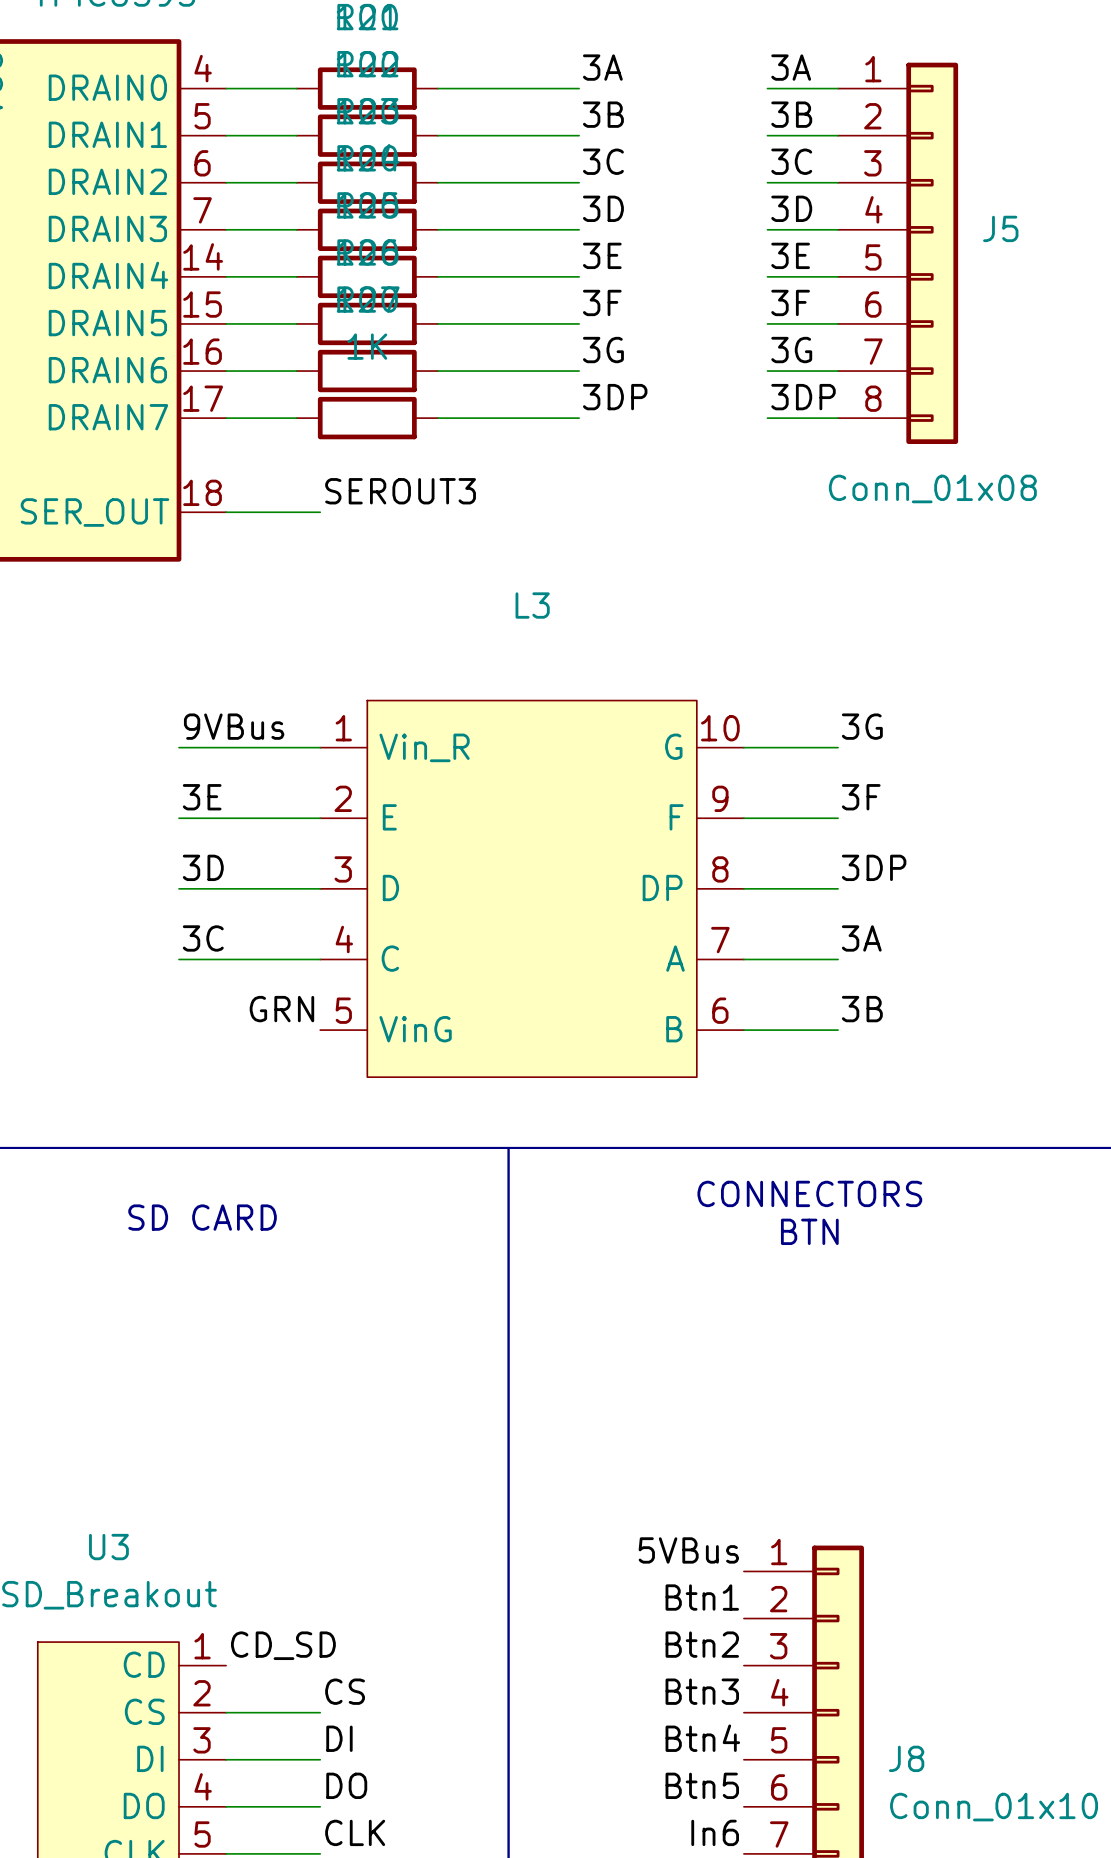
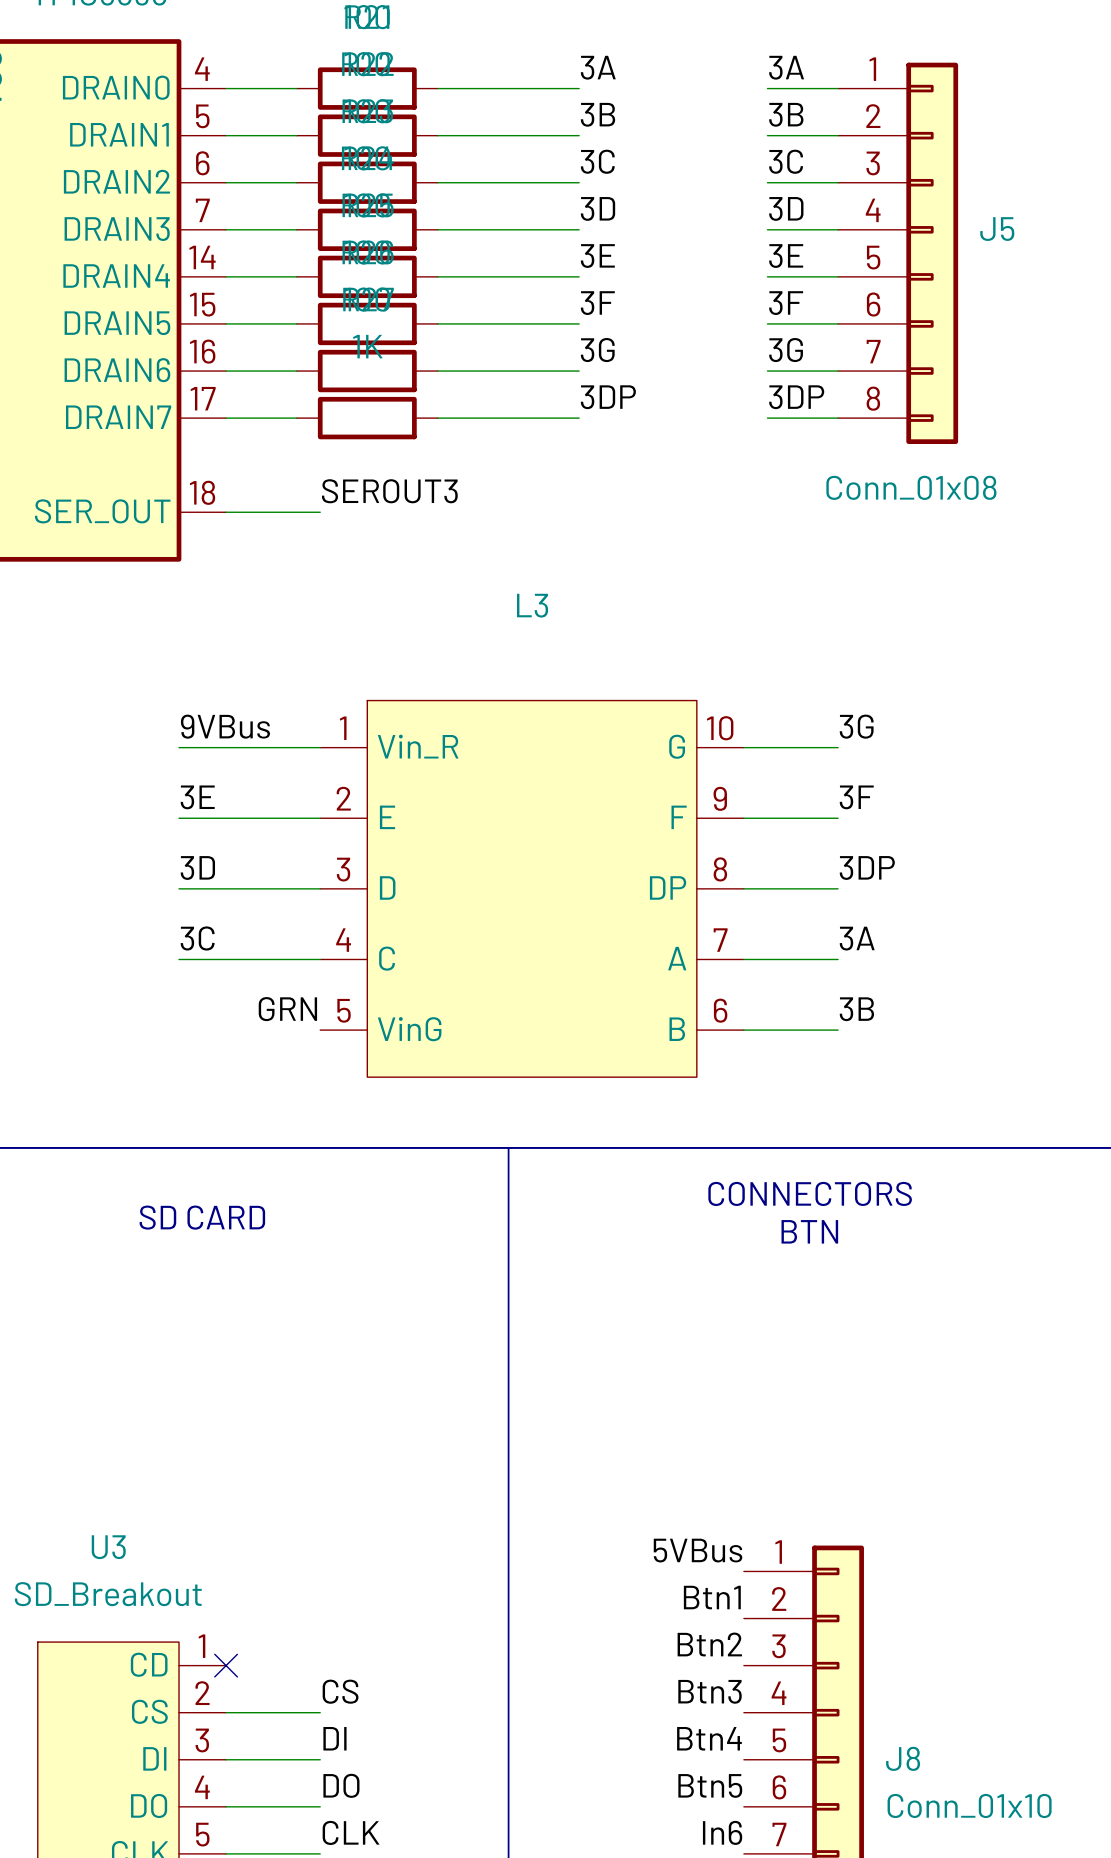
label: CD_SD (283, 1645) -> none
no-connect mark: none -> (226, 1665)

